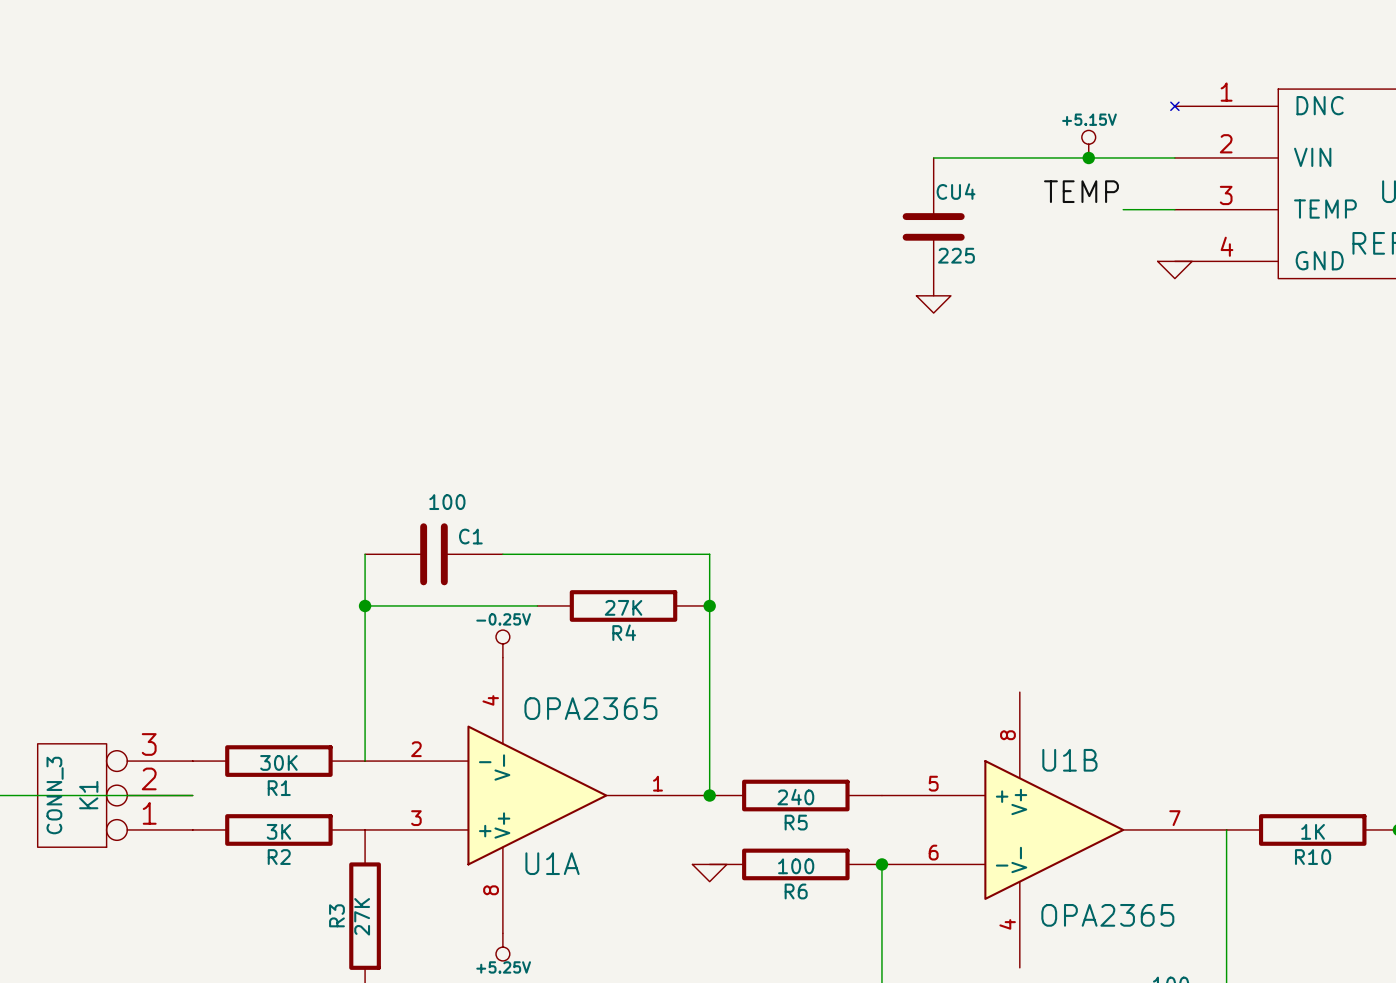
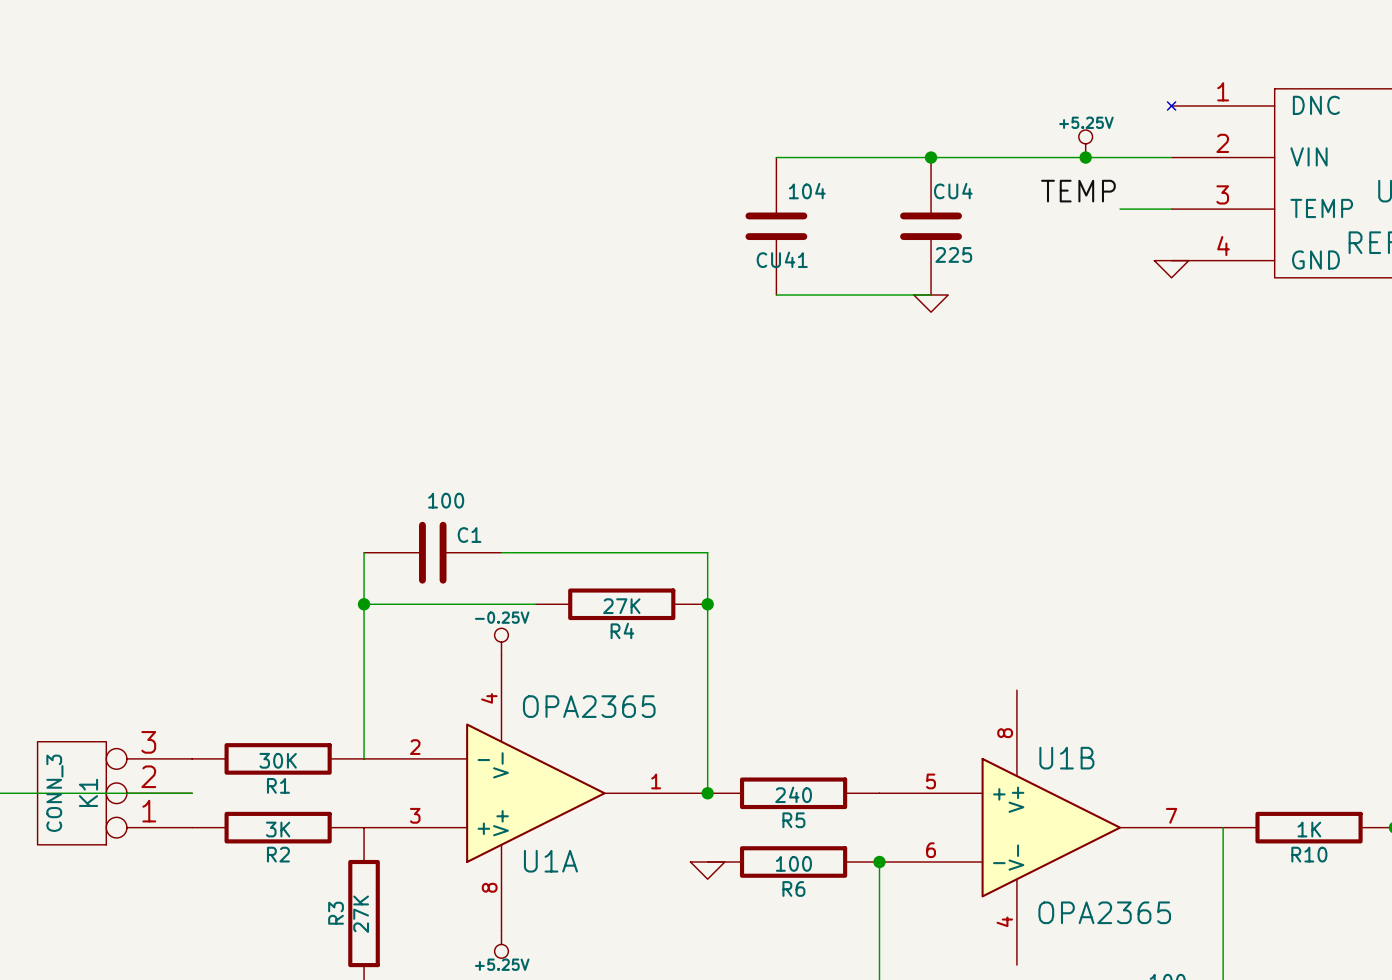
power symbol: +5.15V (1088, 144) -> +5.25V (1085, 143)
wire: none -> (776, 157) (931, 157)
junction: none -> (931, 157)
CU41: none -> 104 (776, 226)
wire: none -> (776, 295) (931, 295)

